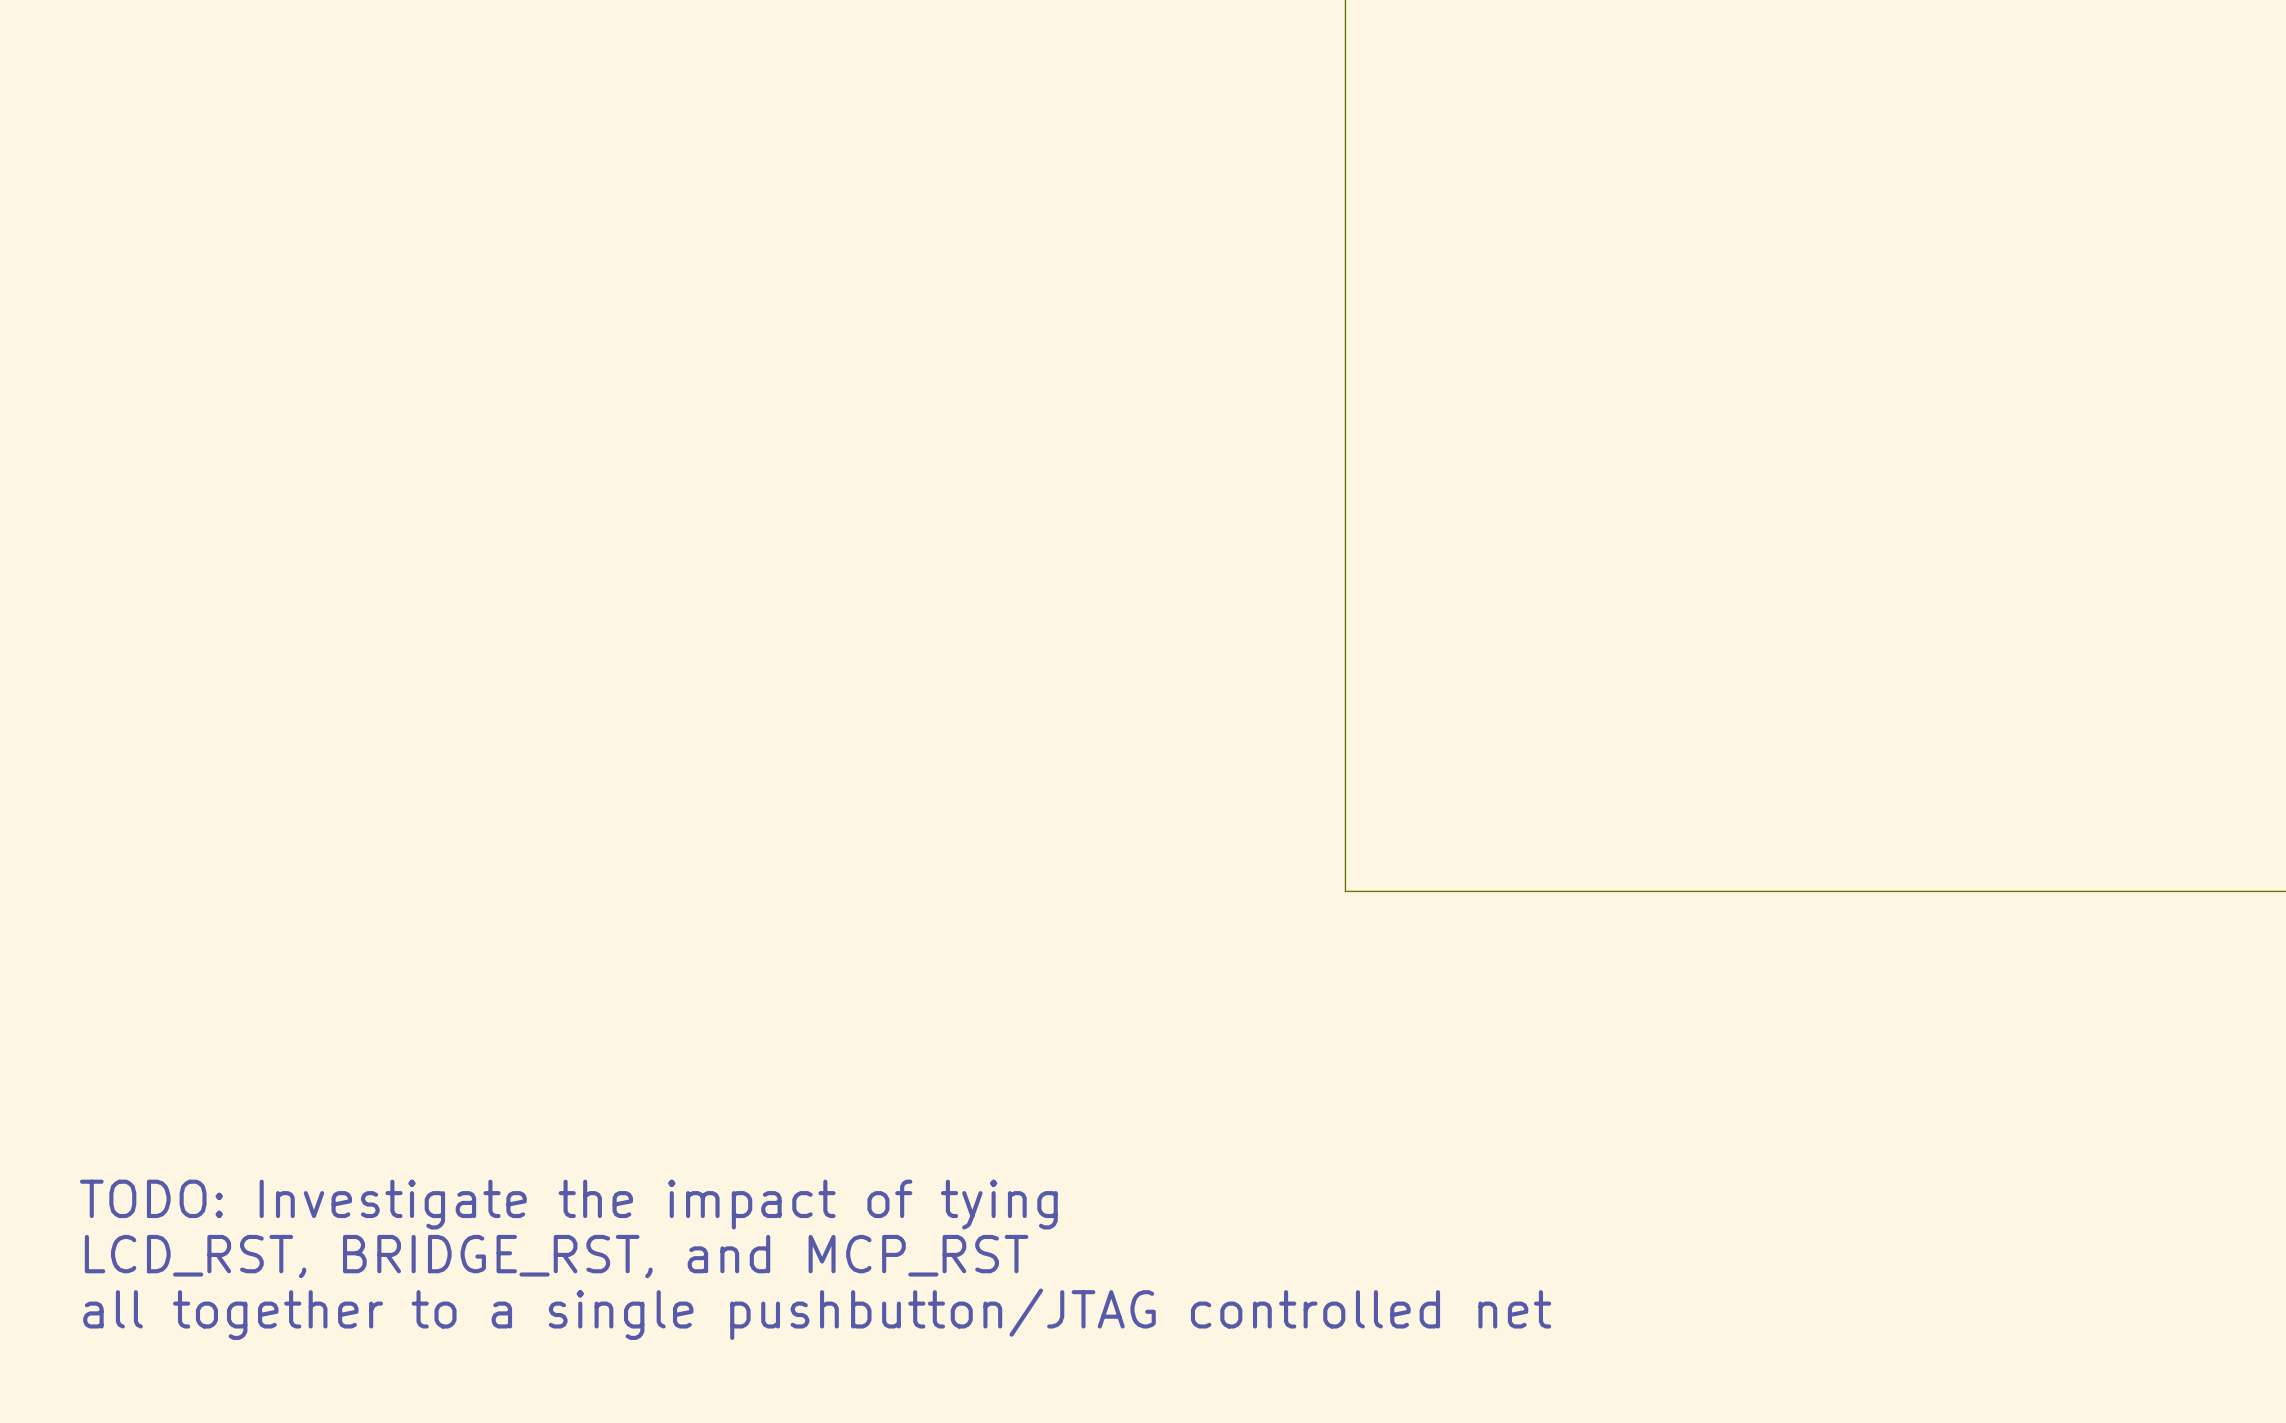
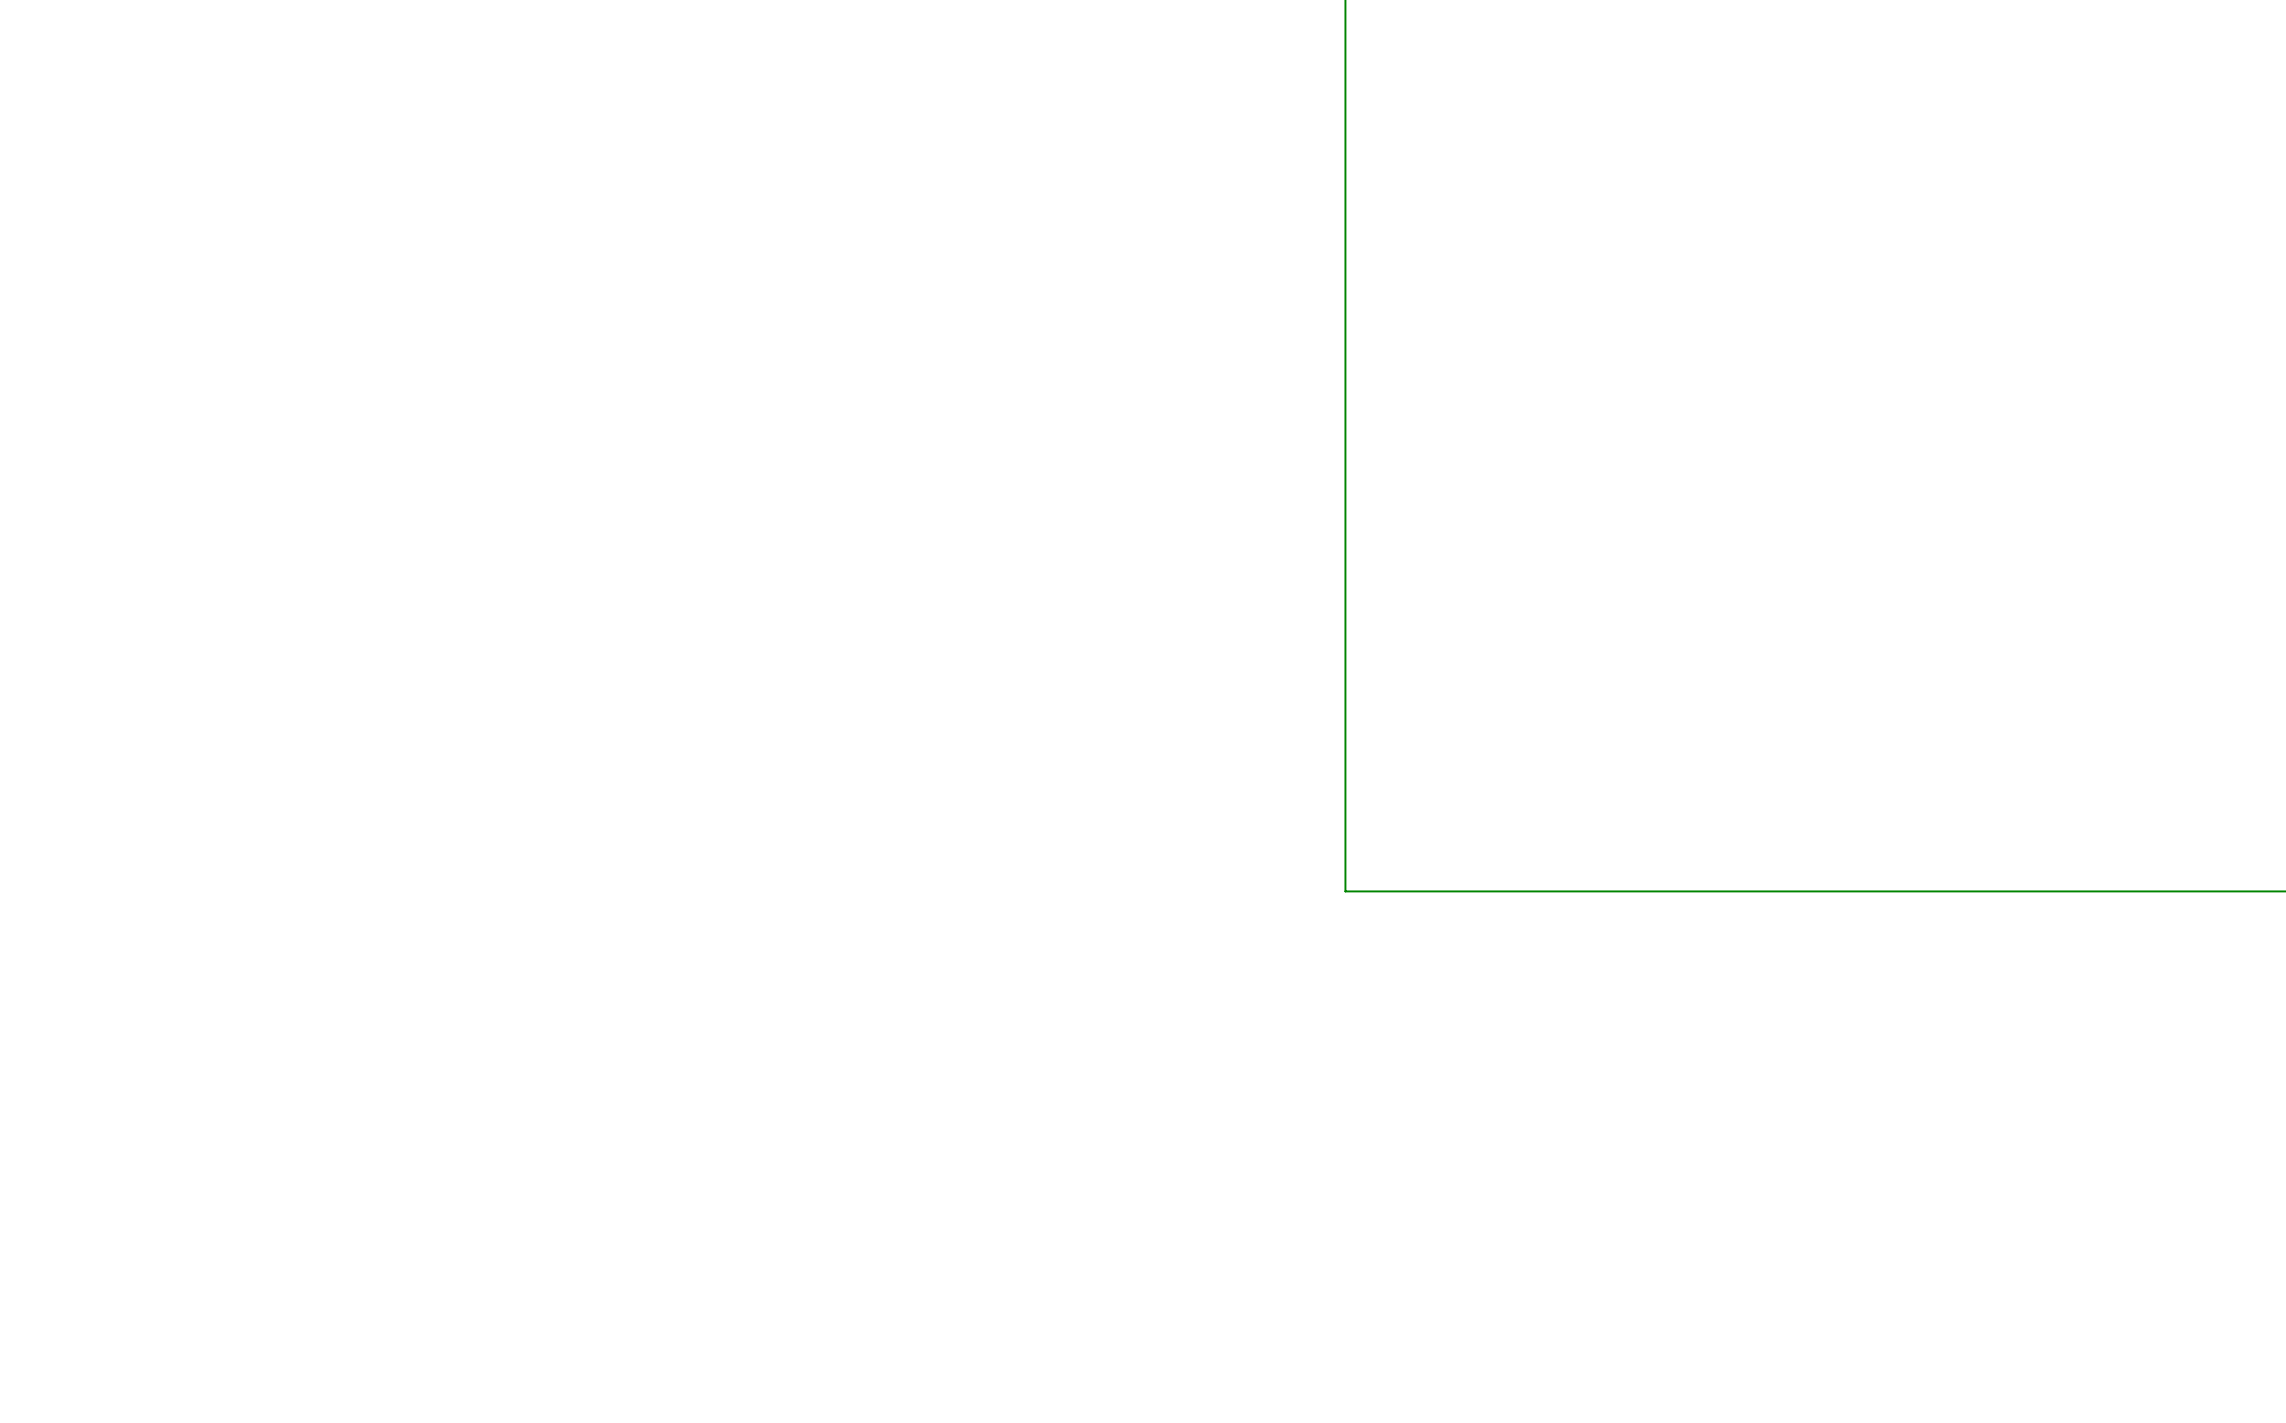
text: TODO: Investigate the impact of tying (568, 1204) -> none
text: LCD_RST, BRIDGE_RST, and MCP_RST (556, 1256) -> none
text: all together to a single pushbutton/JTAG controlled net (817, 1314) -> none

